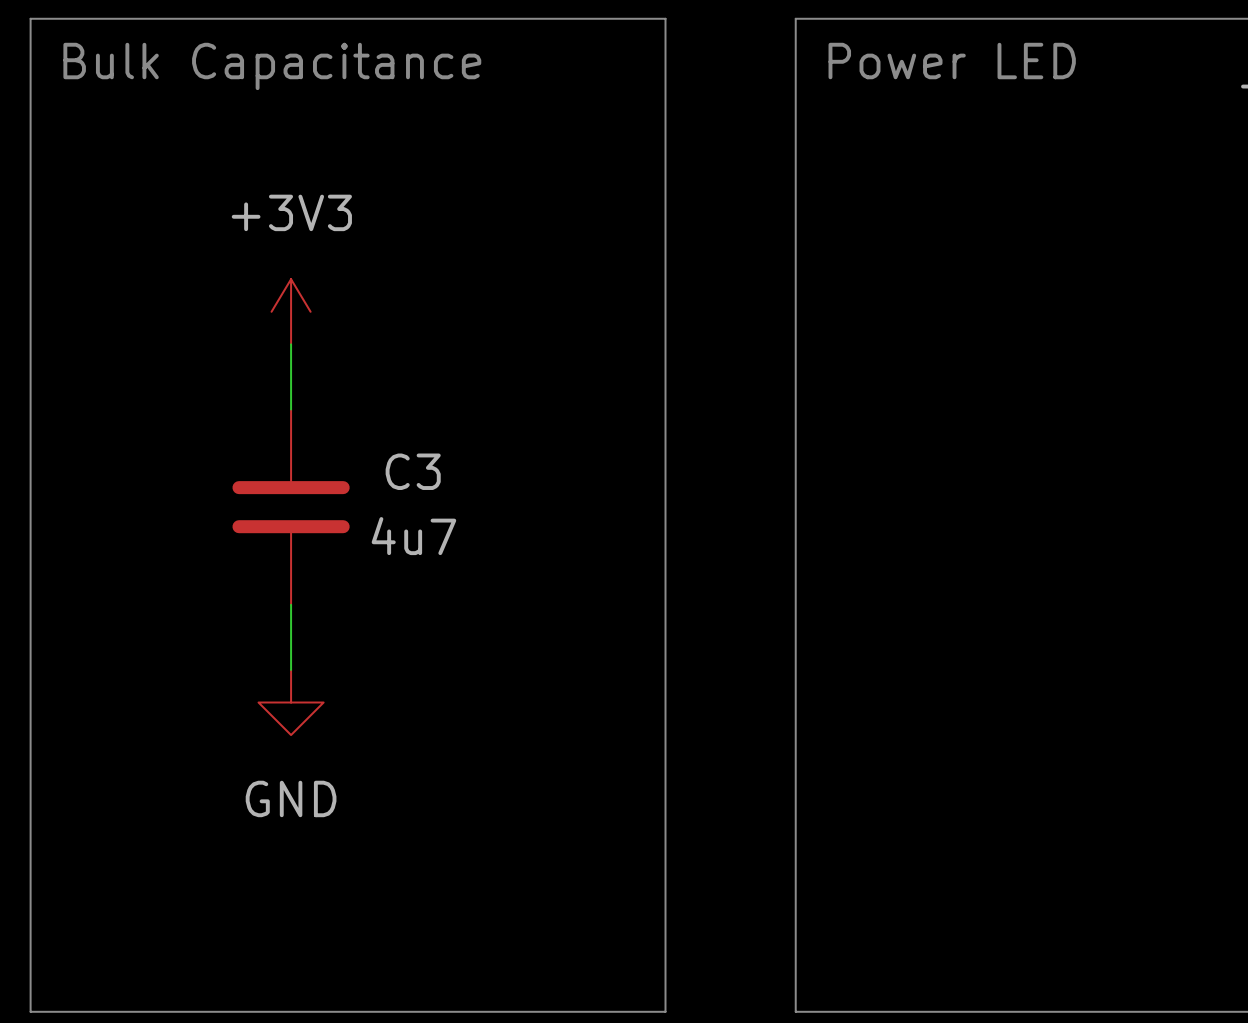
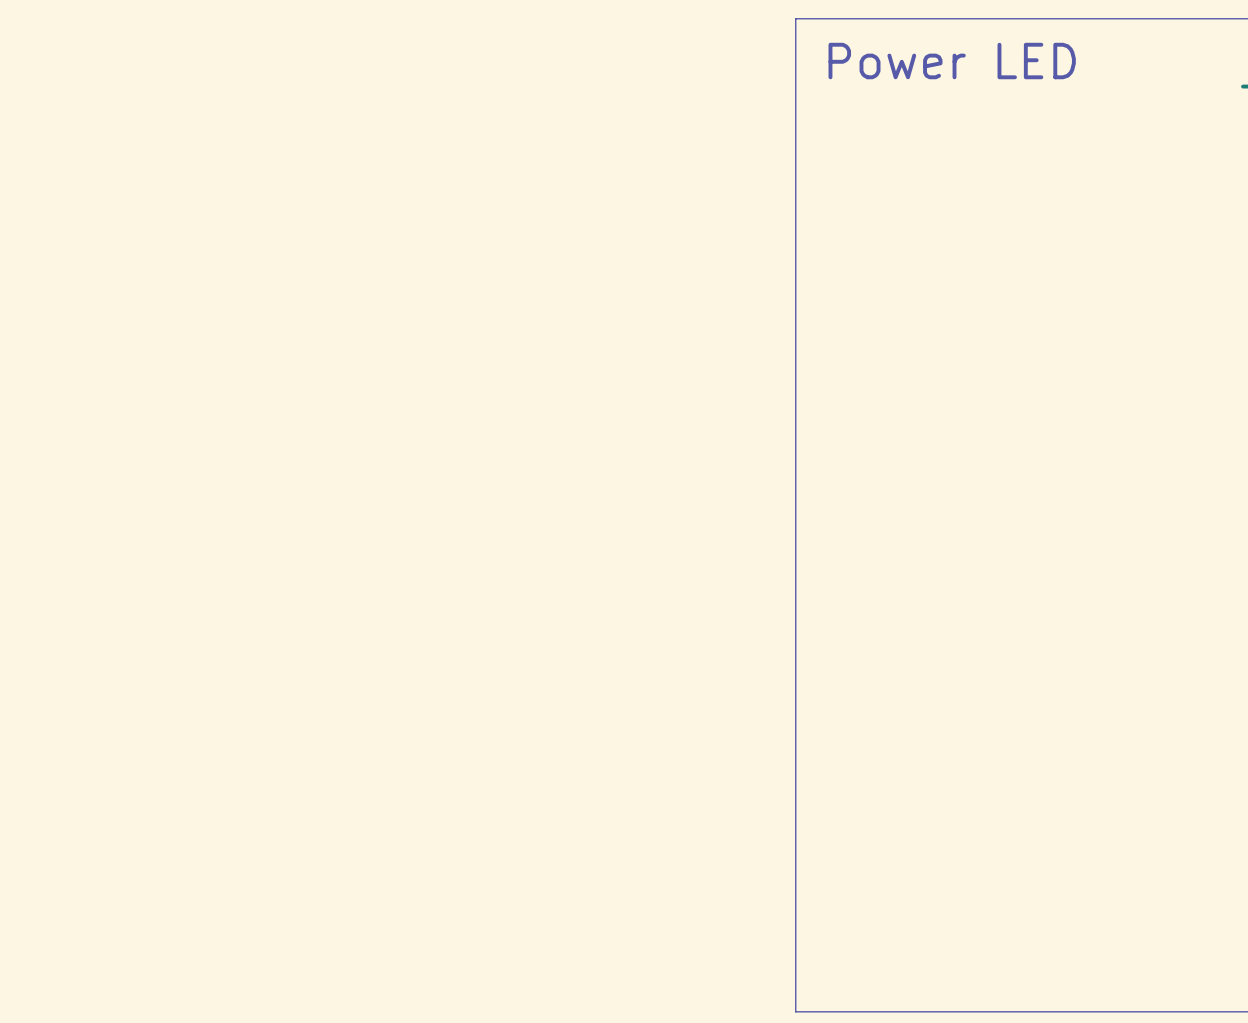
line: (30, 18) (665, 18) (665, 1011) (30, 1011) (30, 18) -> none
text: Bulk Capacitance (272, 66) -> none
power symbol: +3V3 (291, 311) -> none
wire: (291, 344) (291, 409) -> none
C3: 4u7 (291, 507) -> none
wire: (291, 604) (291, 669) -> none
power symbol: GND (291, 702) -> none

